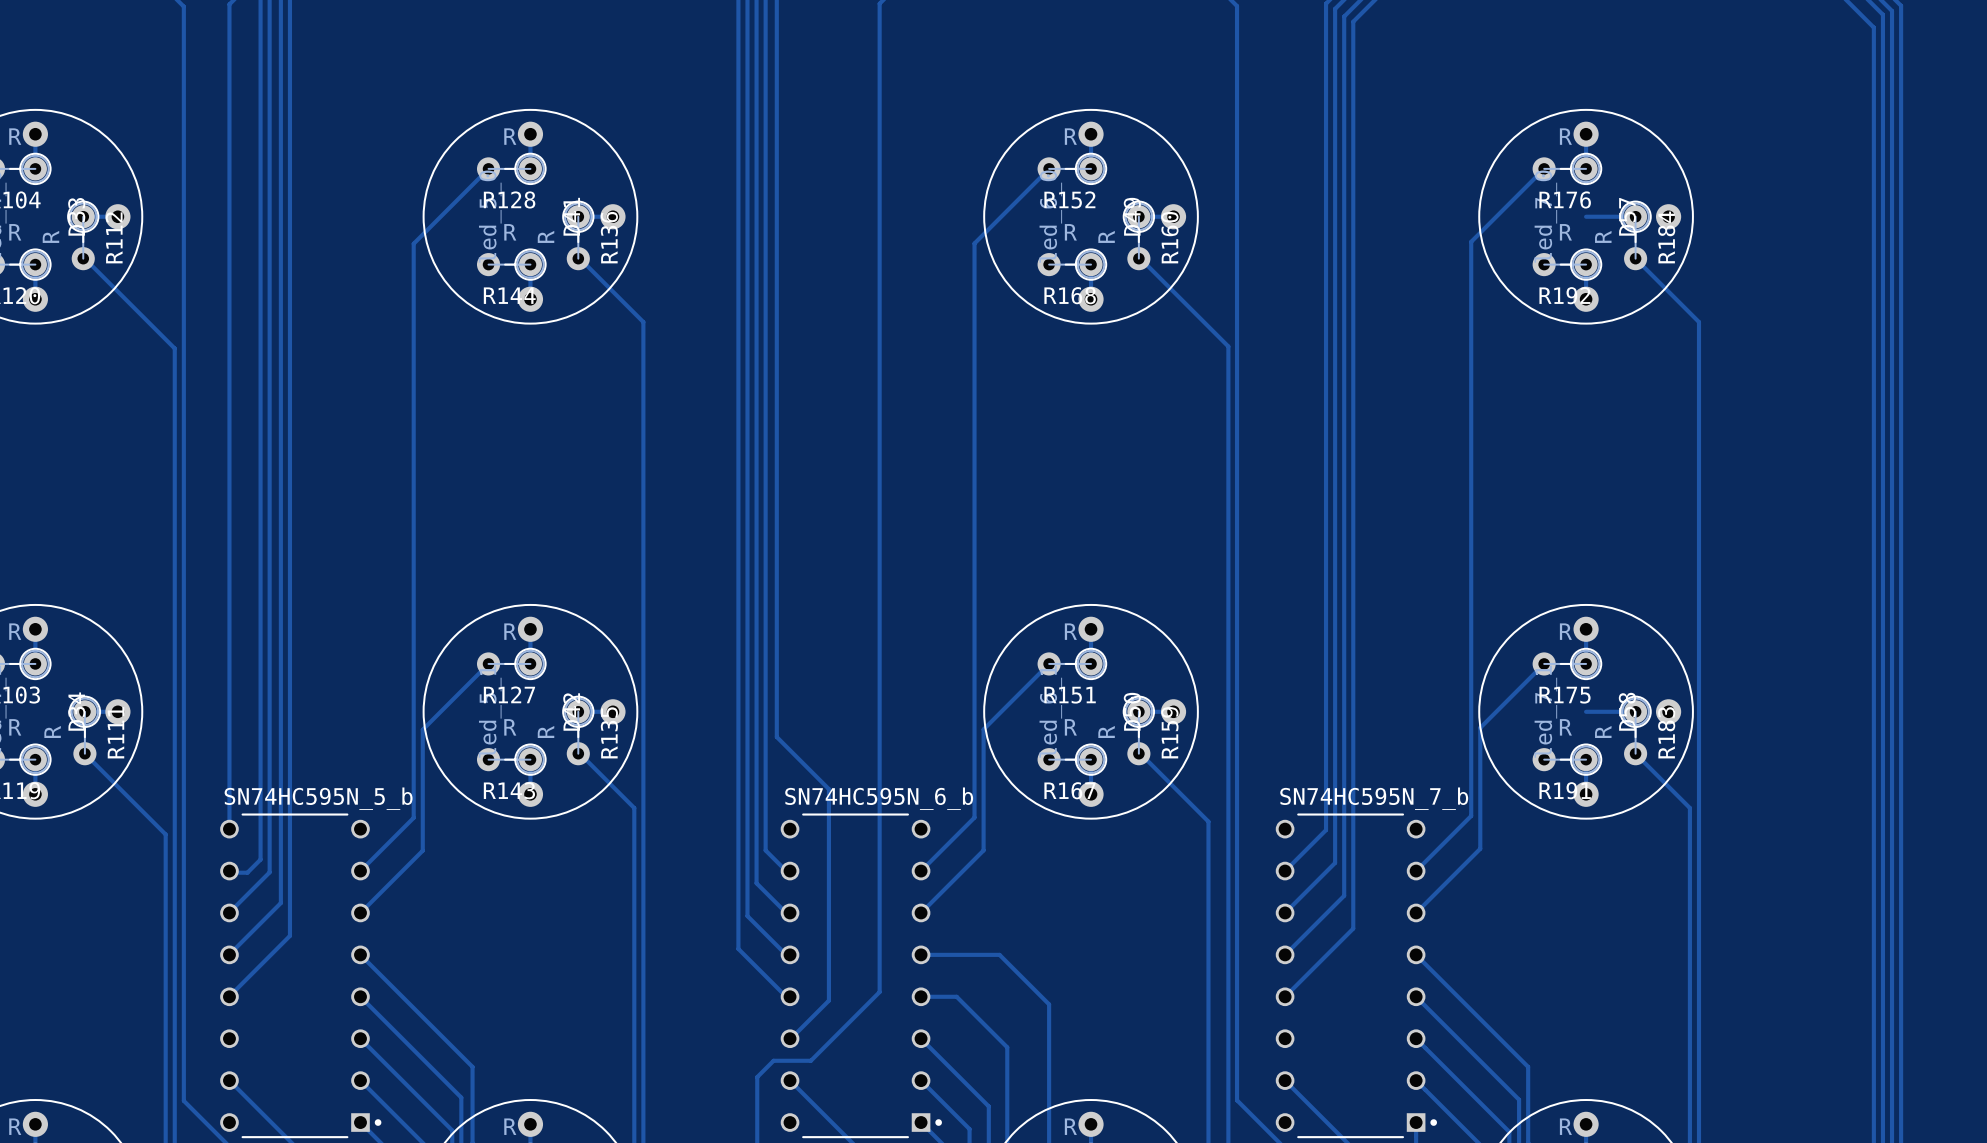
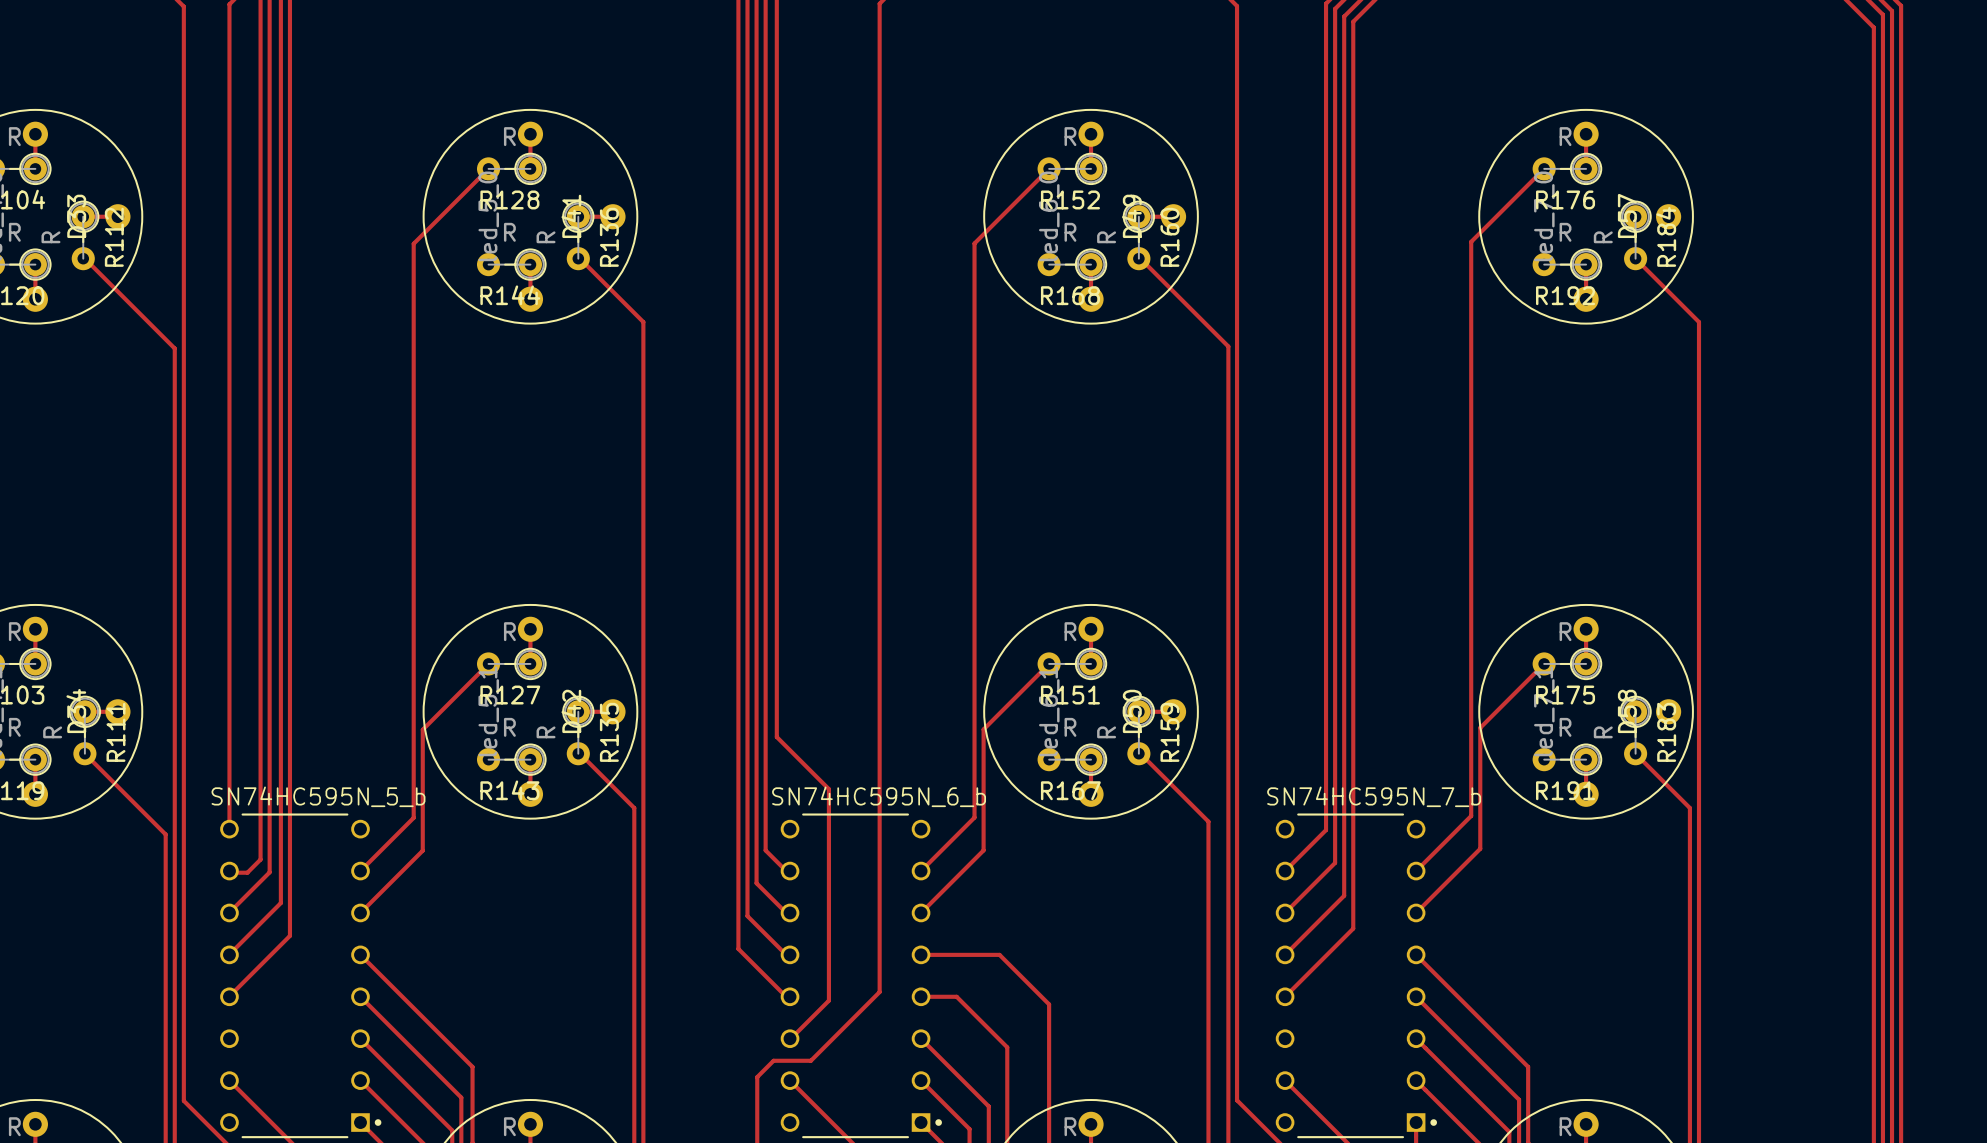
track: (1586, 216) (1633, 216) -> none
track: (1586, 711) (1633, 711) -> none

